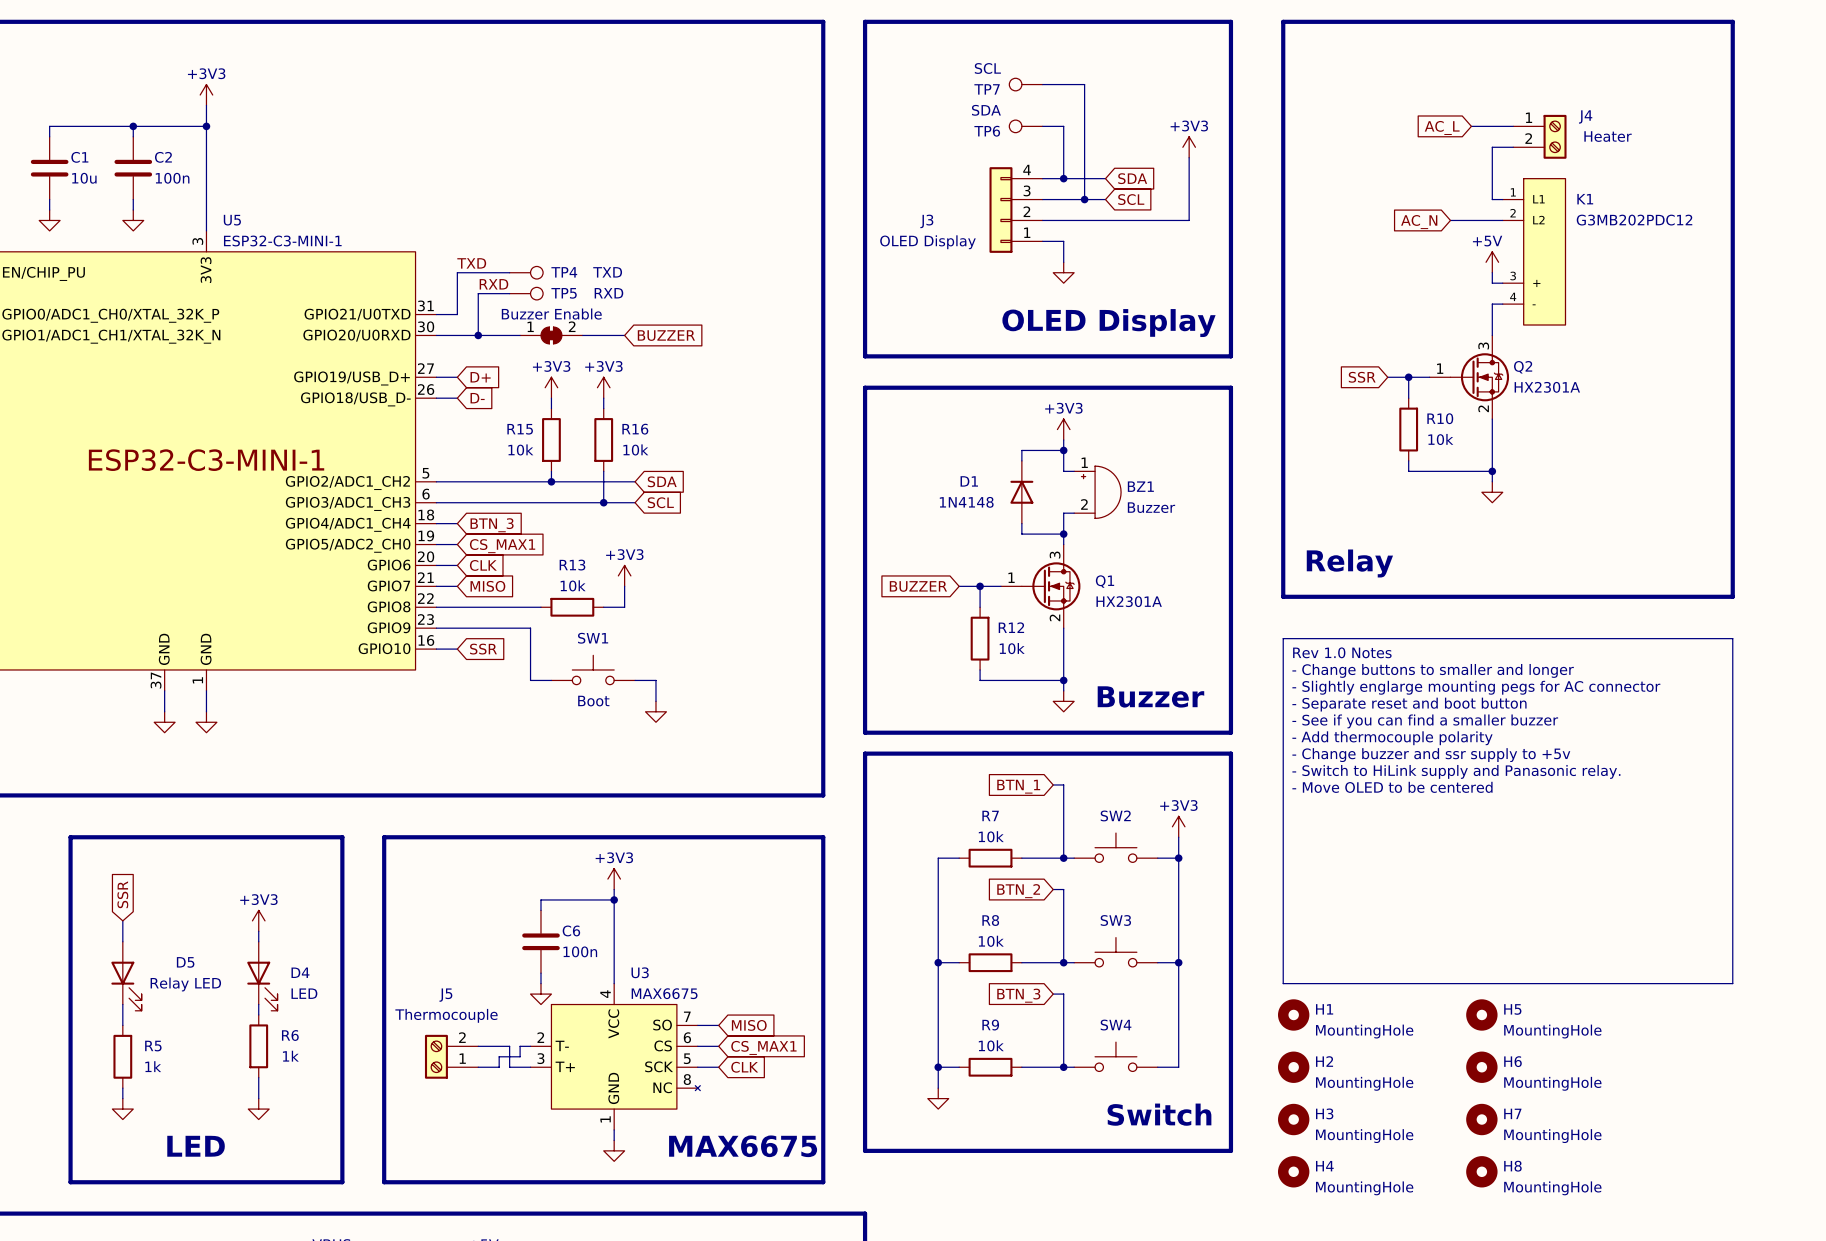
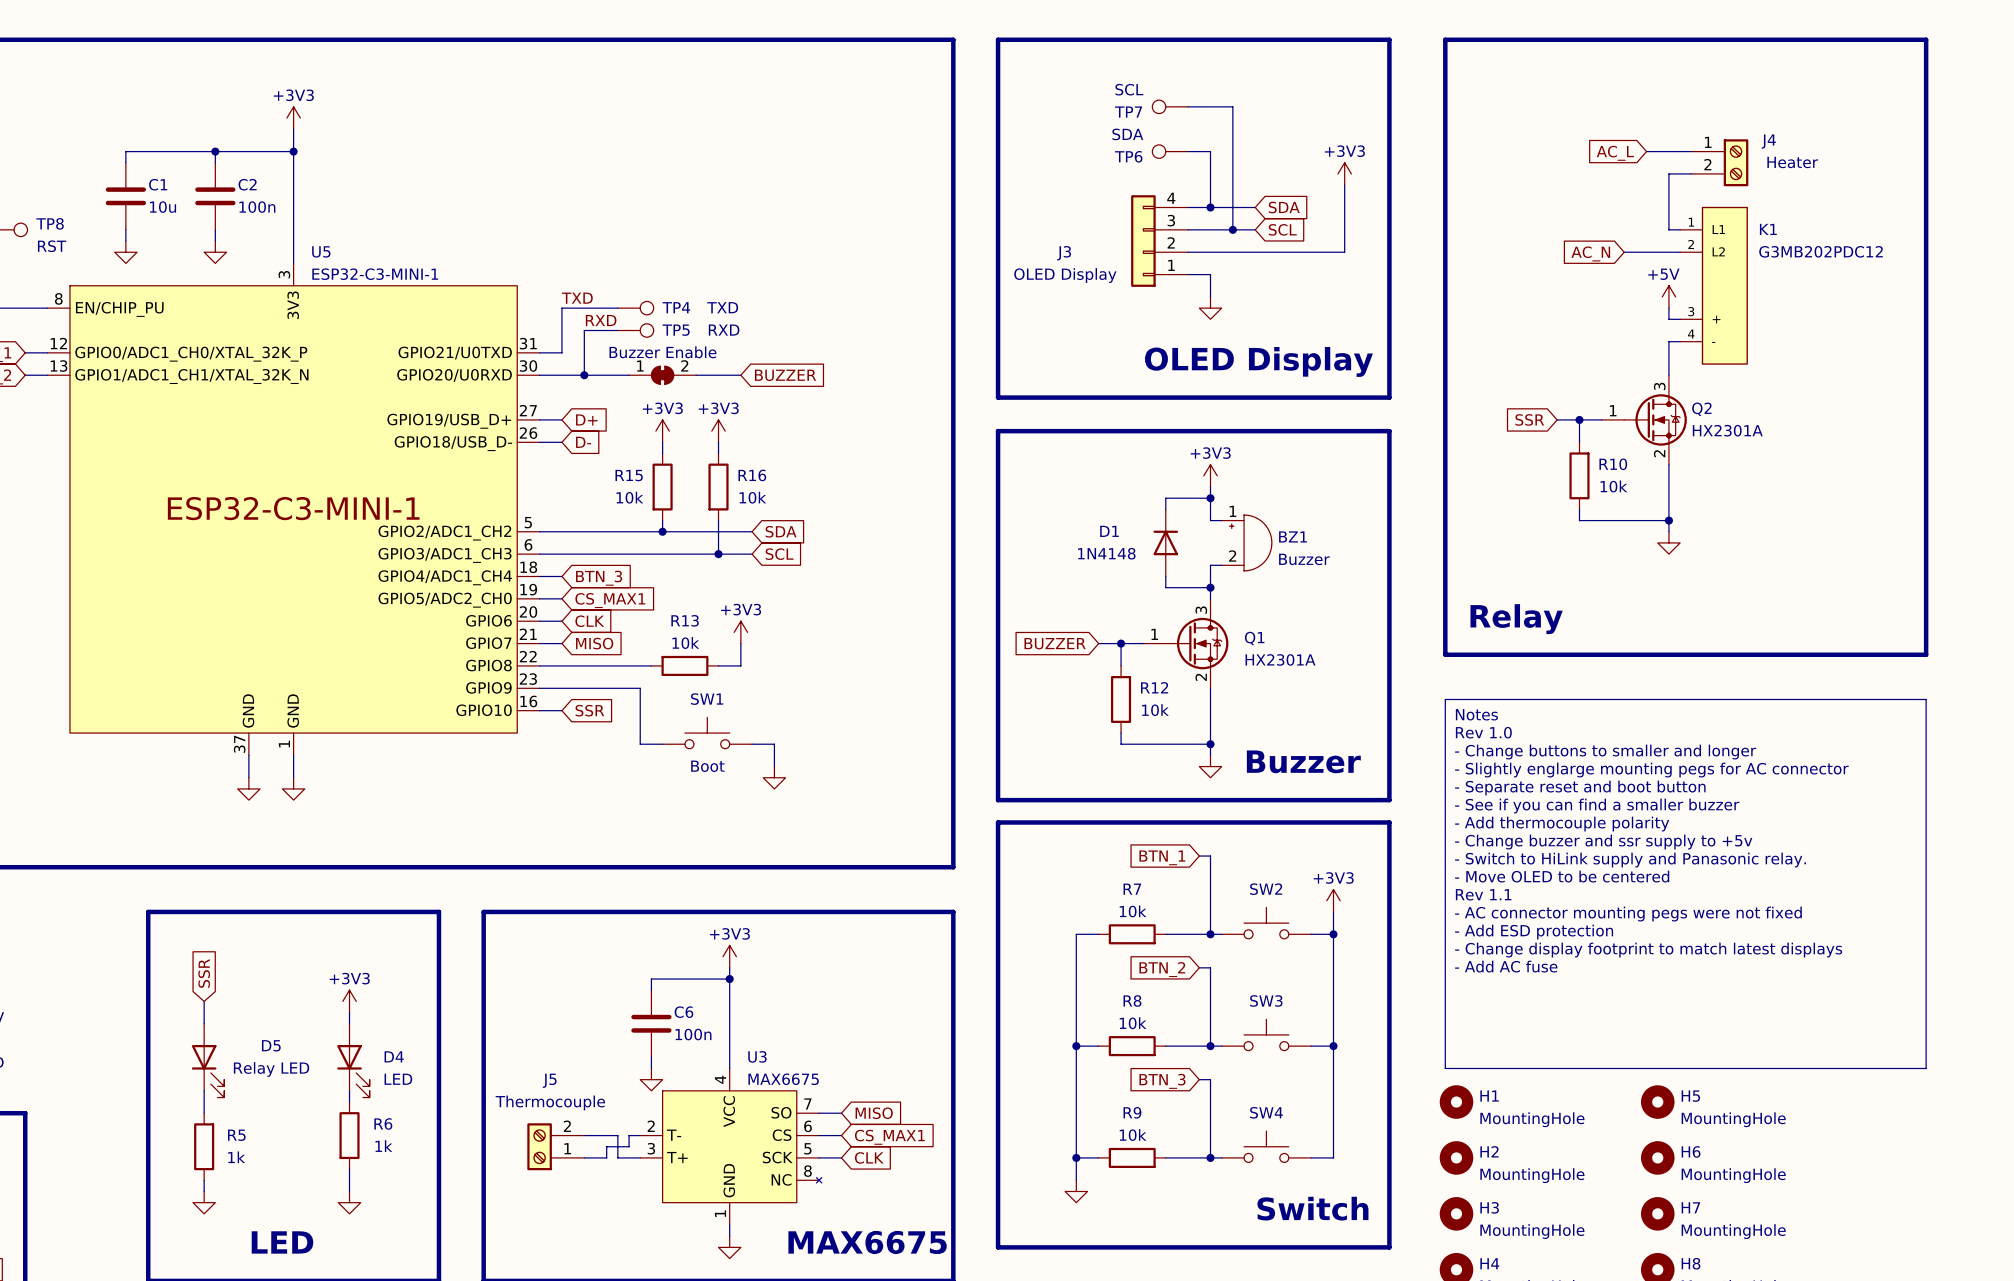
text: Rev 1.0 Notes (1342, 652) -> Notes (1476, 714)
text: - Change buttons to smaller and longer (1433, 670) -> Rev 1.0 (1483, 732)
text: - Slightly englarge mounting pegs for AC connector (1476, 687) -> - Change buttons to smaller and longer (1605, 752)
text: - Separate reset and boot button (1409, 704) -> - Slightly englarge mounting pegs for AC connector (1651, 770)
text: - See if you can find a smaller buzzer (1425, 721) -> - Separate reset and boot button (1580, 788)
text: - Add thermocouple polarity (1392, 738) -> - See if you can find a smaller buzzer (1597, 806)
text: - Change buzzer and ssr supply to +5v (1431, 755) -> - Add thermocouple polarity (1562, 824)
text: - Switch to HiLink supply and Panasonic relay. (1456, 771) -> - Change buzzer and ssr supply to +5v (1603, 842)
text: - Move OLED to be centered (1392, 787) -> - Switch to HiLink supply and Panasonic relay. (1630, 860)
text: none -> - Move OLED to be centered (1562, 876)
text: none -> Rev 1.1 (1483, 894)
text: none -> - AC connector mounting pegs were not fixed (1628, 914)
text: none -> - Add ESD protection (1534, 932)
text: none -> - Change display footprint to match latest displays (1648, 950)
text: none -> - Add AC fuse (1506, 966)

